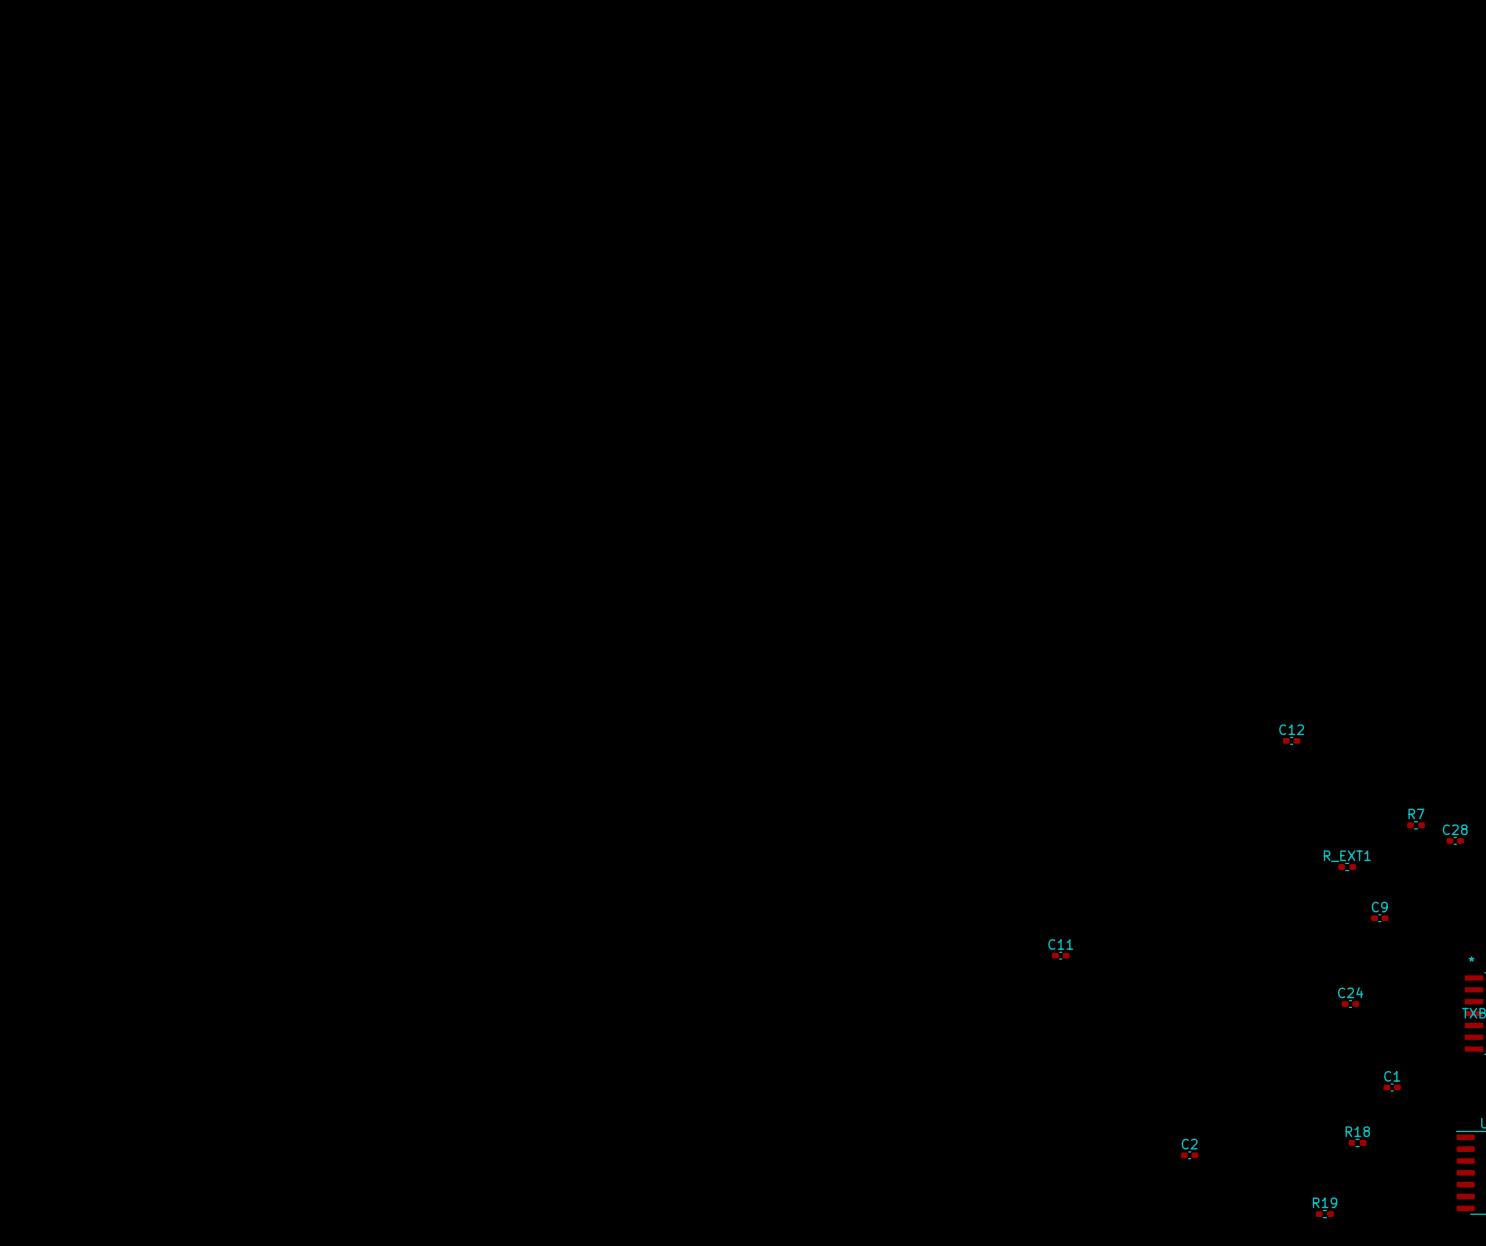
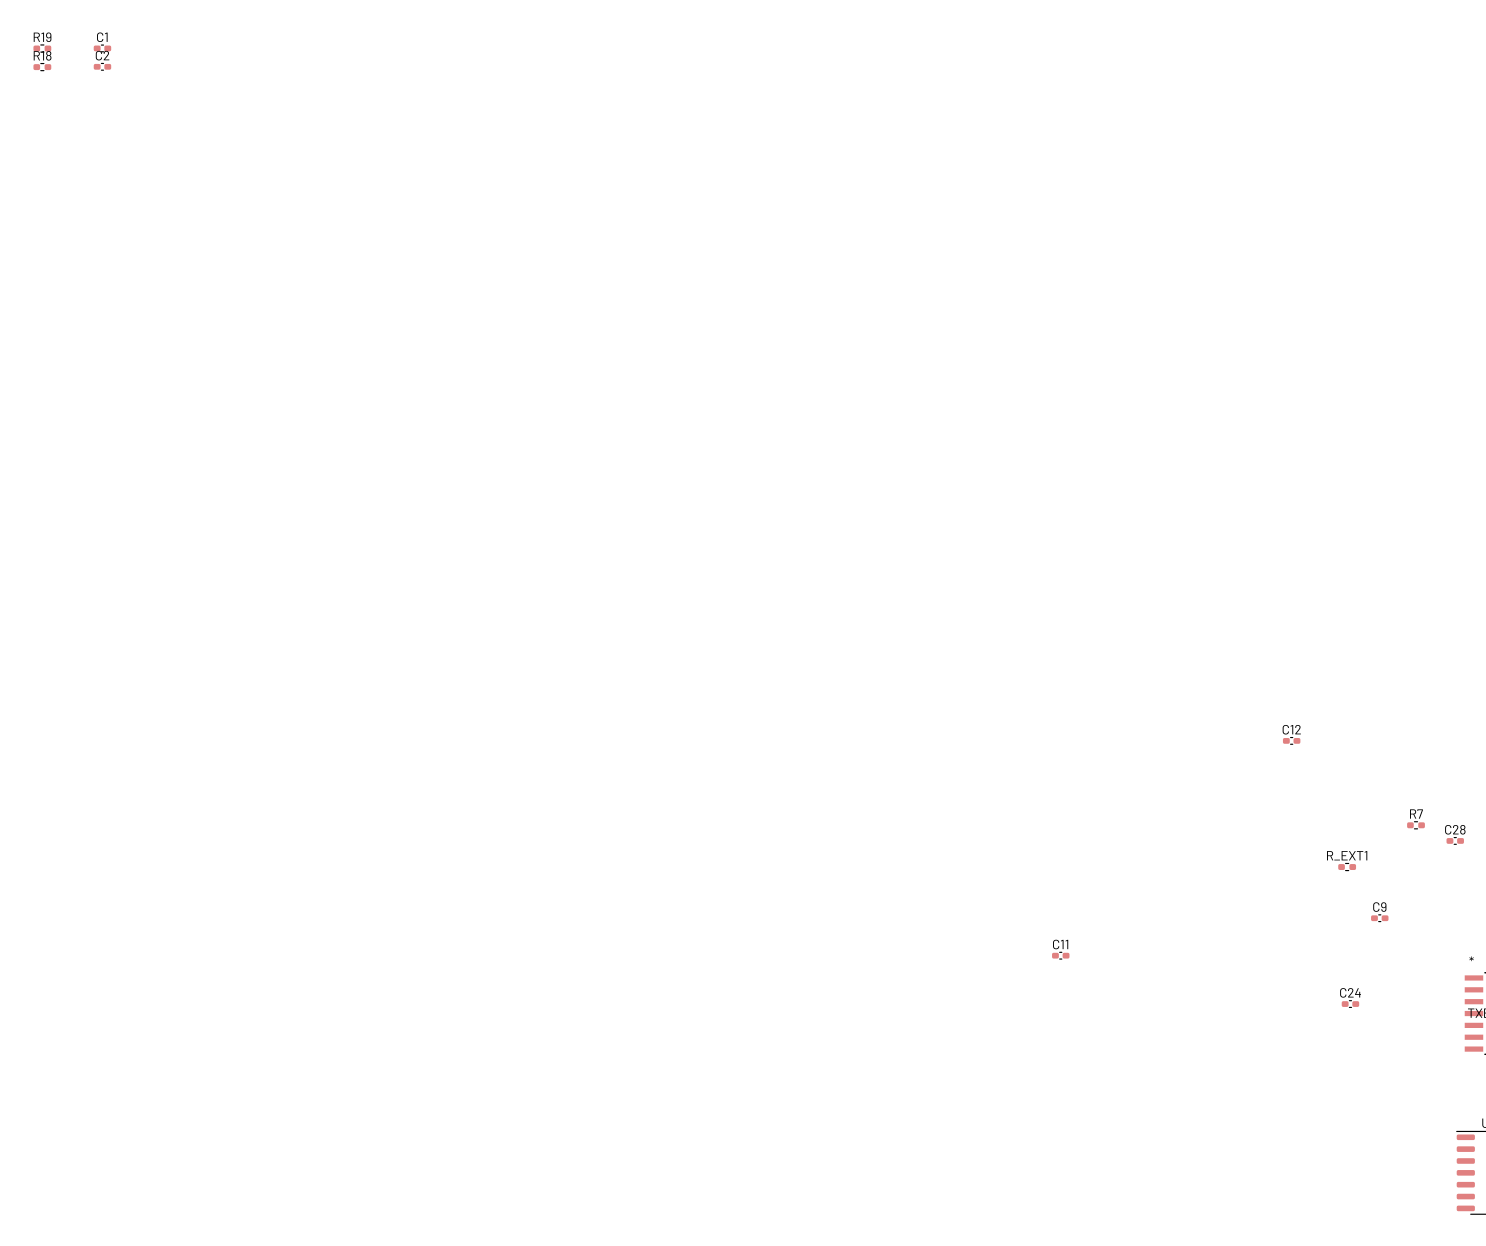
C1 position: (1392, 1087) -> (102, 48)
R18 position: (1357, 1142) -> (42, 67)
C2 position: (1189, 1155) -> (102, 66)
R19 position: (1324, 1214) -> (42, 48)

